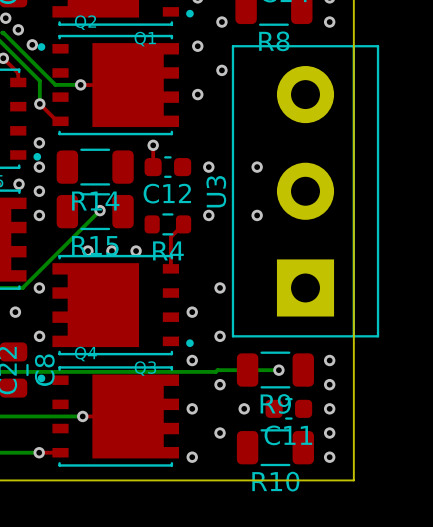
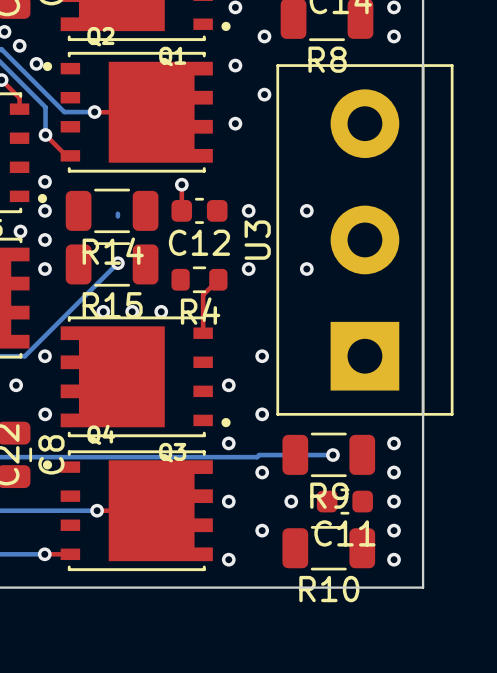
bottom track: none -> (117, 213) (117, 216)

